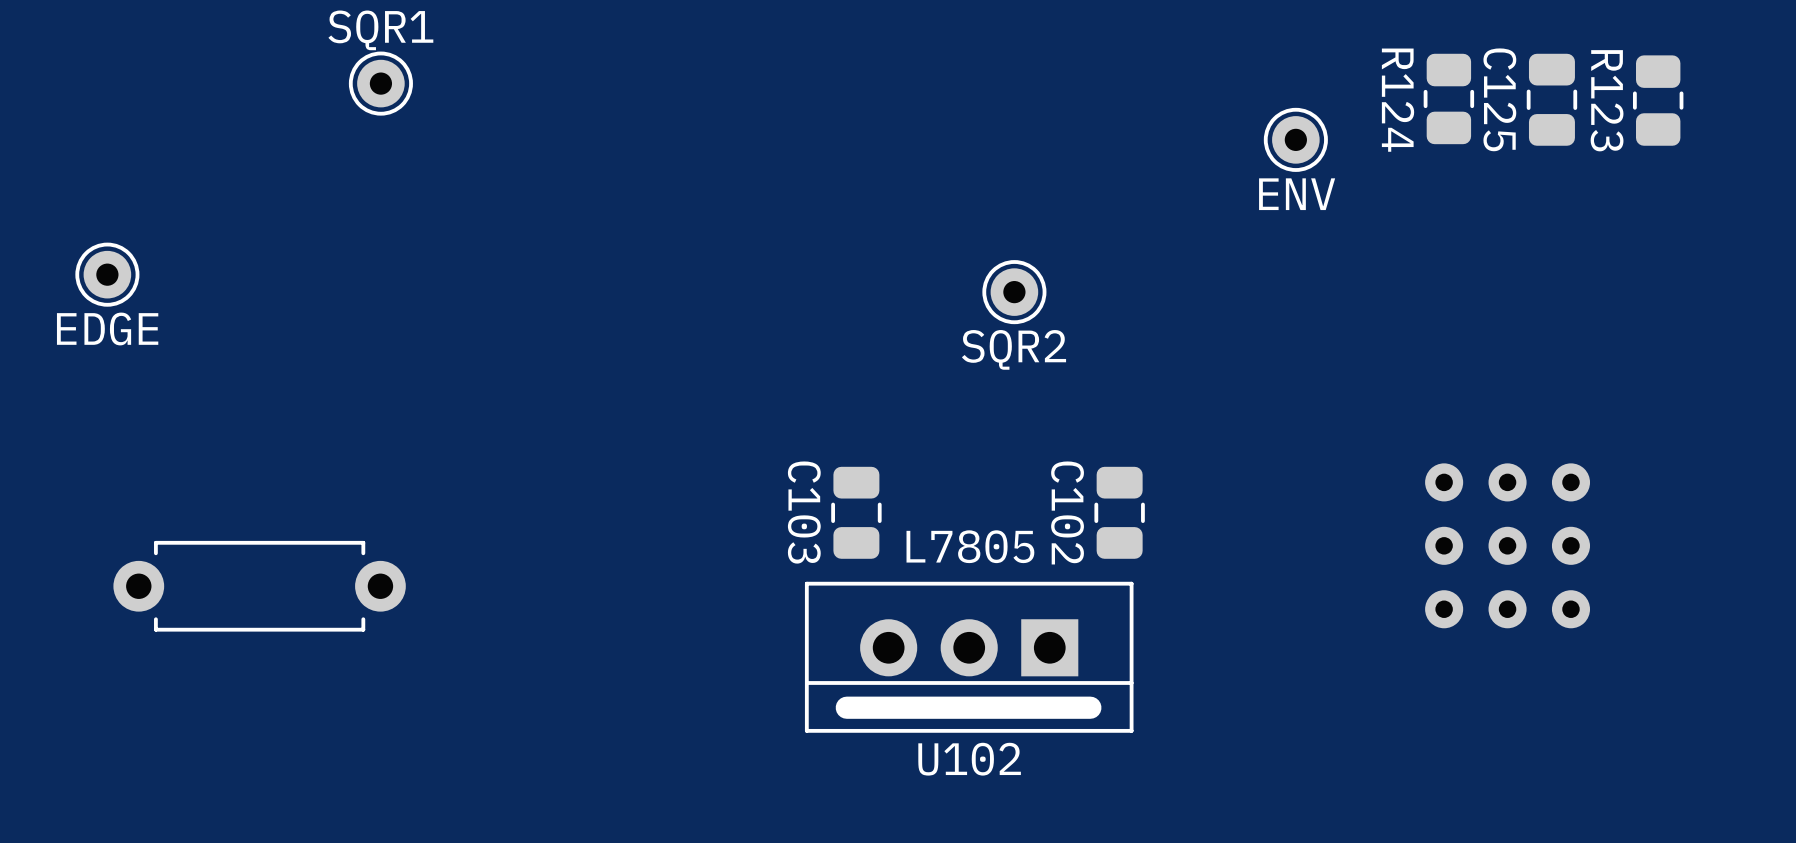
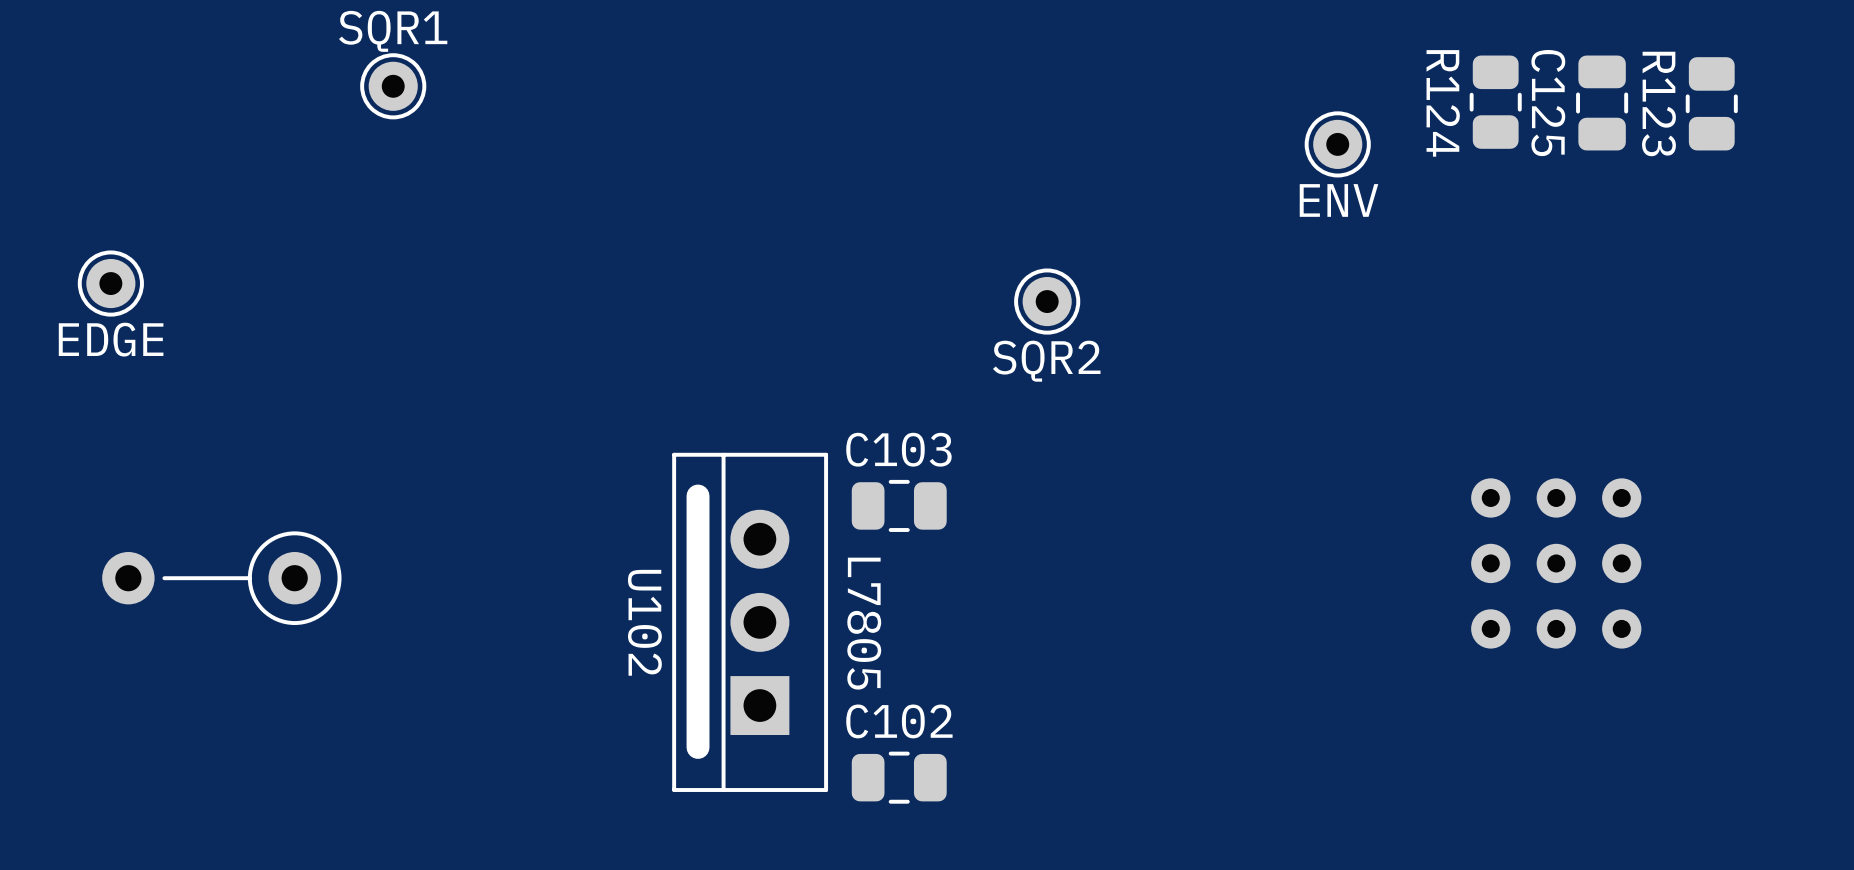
C103 rotation: 0° (856, 512) -> 90° clockwise (899, 505)
C102 rotation: 0° (1119, 512) -> 90° clockwise (899, 777)
C102 position: (1119, 512) -> (899, 777)
part: none -> (221, 578)
part: (259, 586) -> none
U102 rotation: 0° (969, 657) -> 90° clockwise (750, 622)
U102 position: (969, 657) -> (750, 622)

